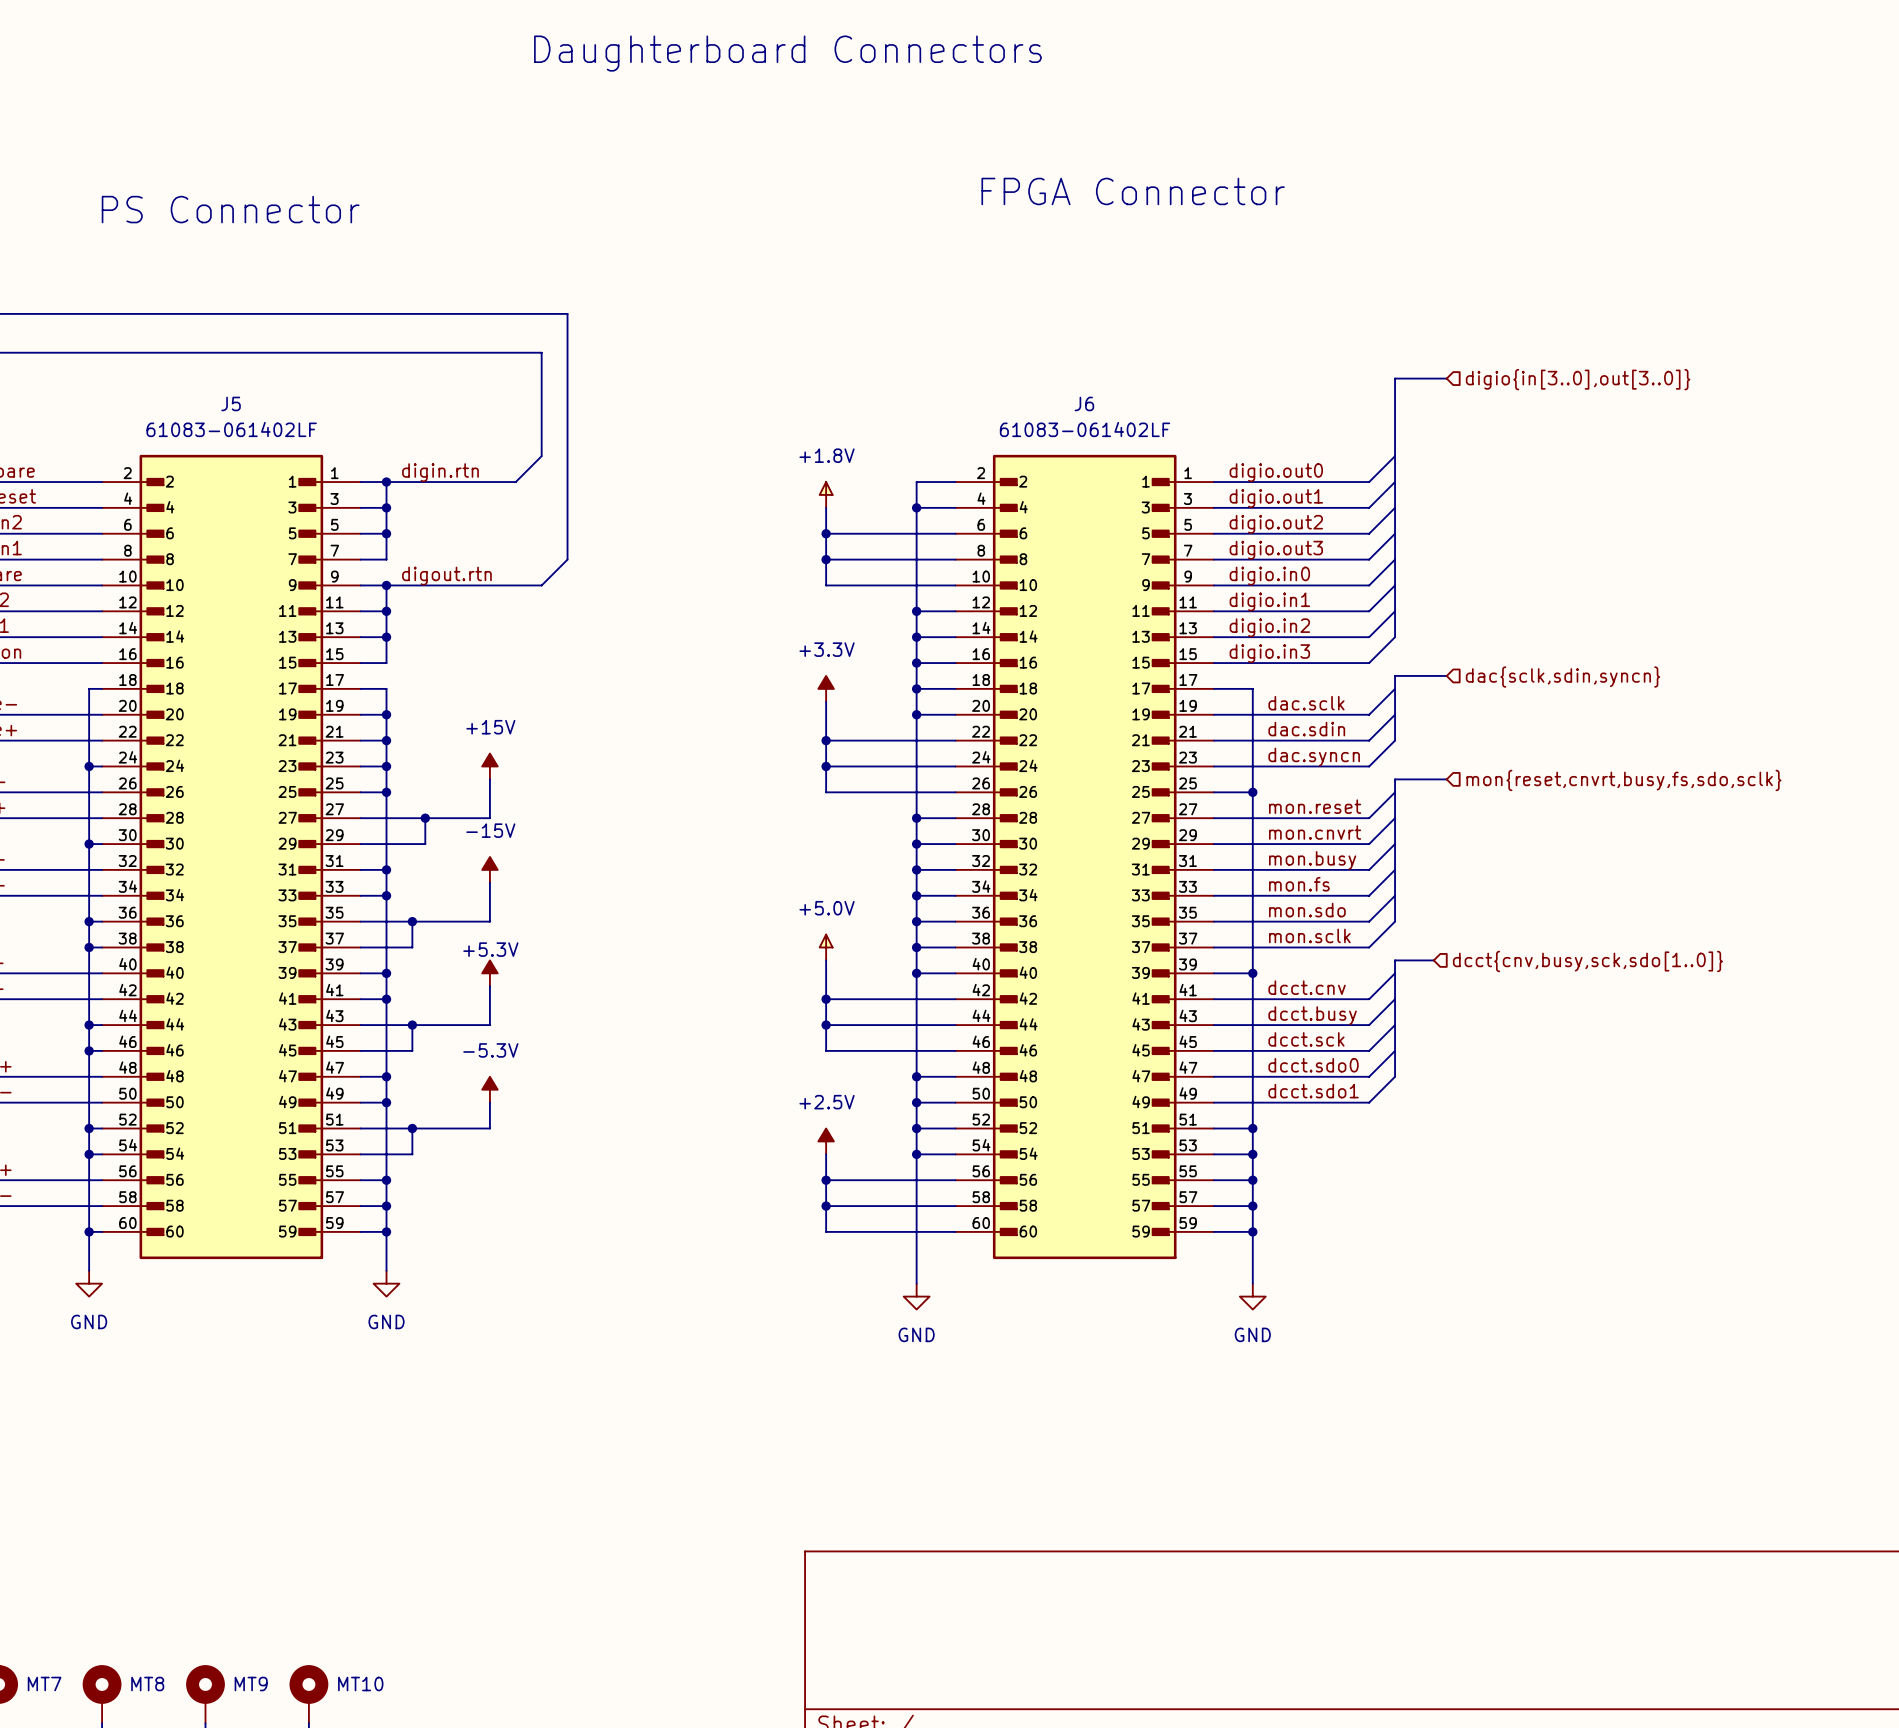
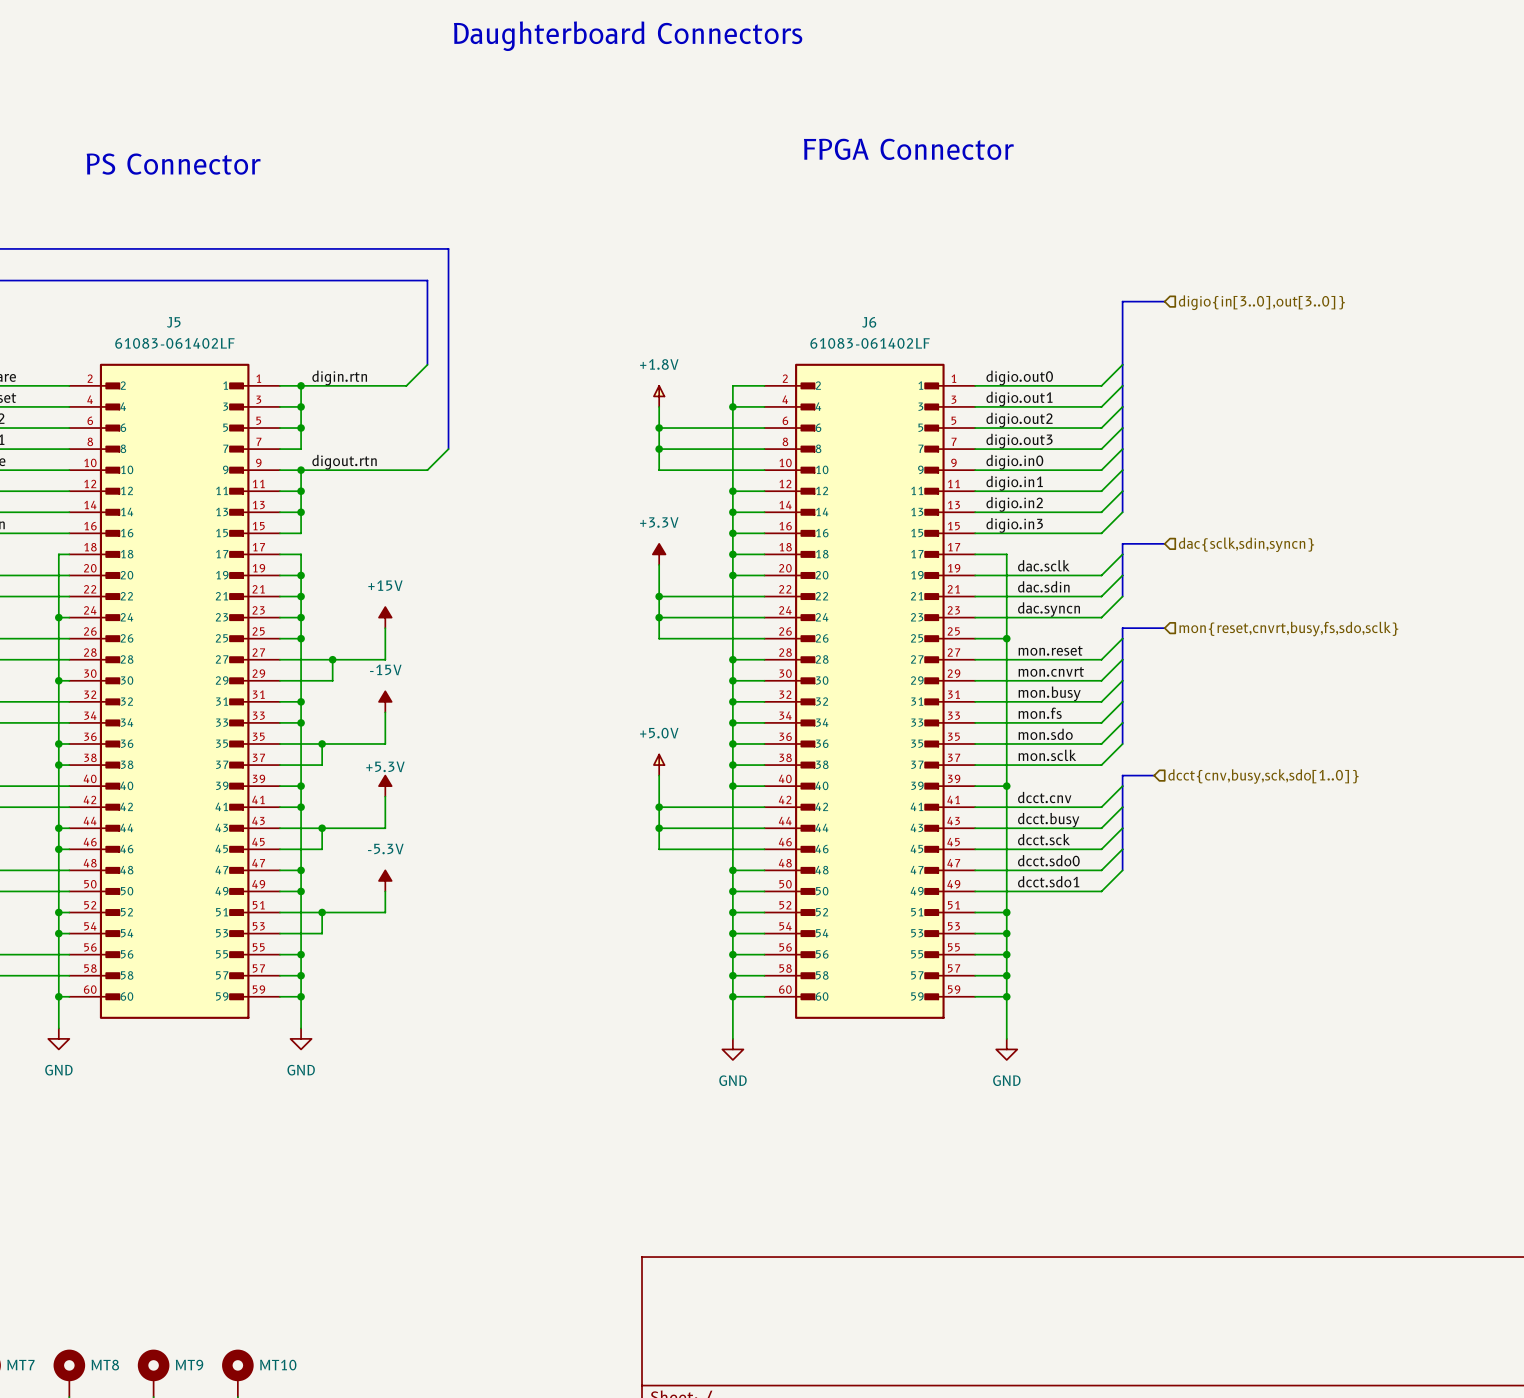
power symbol: +2.5V (826, 1141) -> none
wire: (826, 1154) (826, 1231) (916, 1231) -> none
wire: (826, 1180) (916, 1180) -> none
junction: (826, 1180) -> none
junction: none -> (732, 954)
wire: (826, 1206) (916, 1206) -> none
junction: (826, 1206) -> none
junction: none -> (732, 975)
junction: none -> (732, 996)

